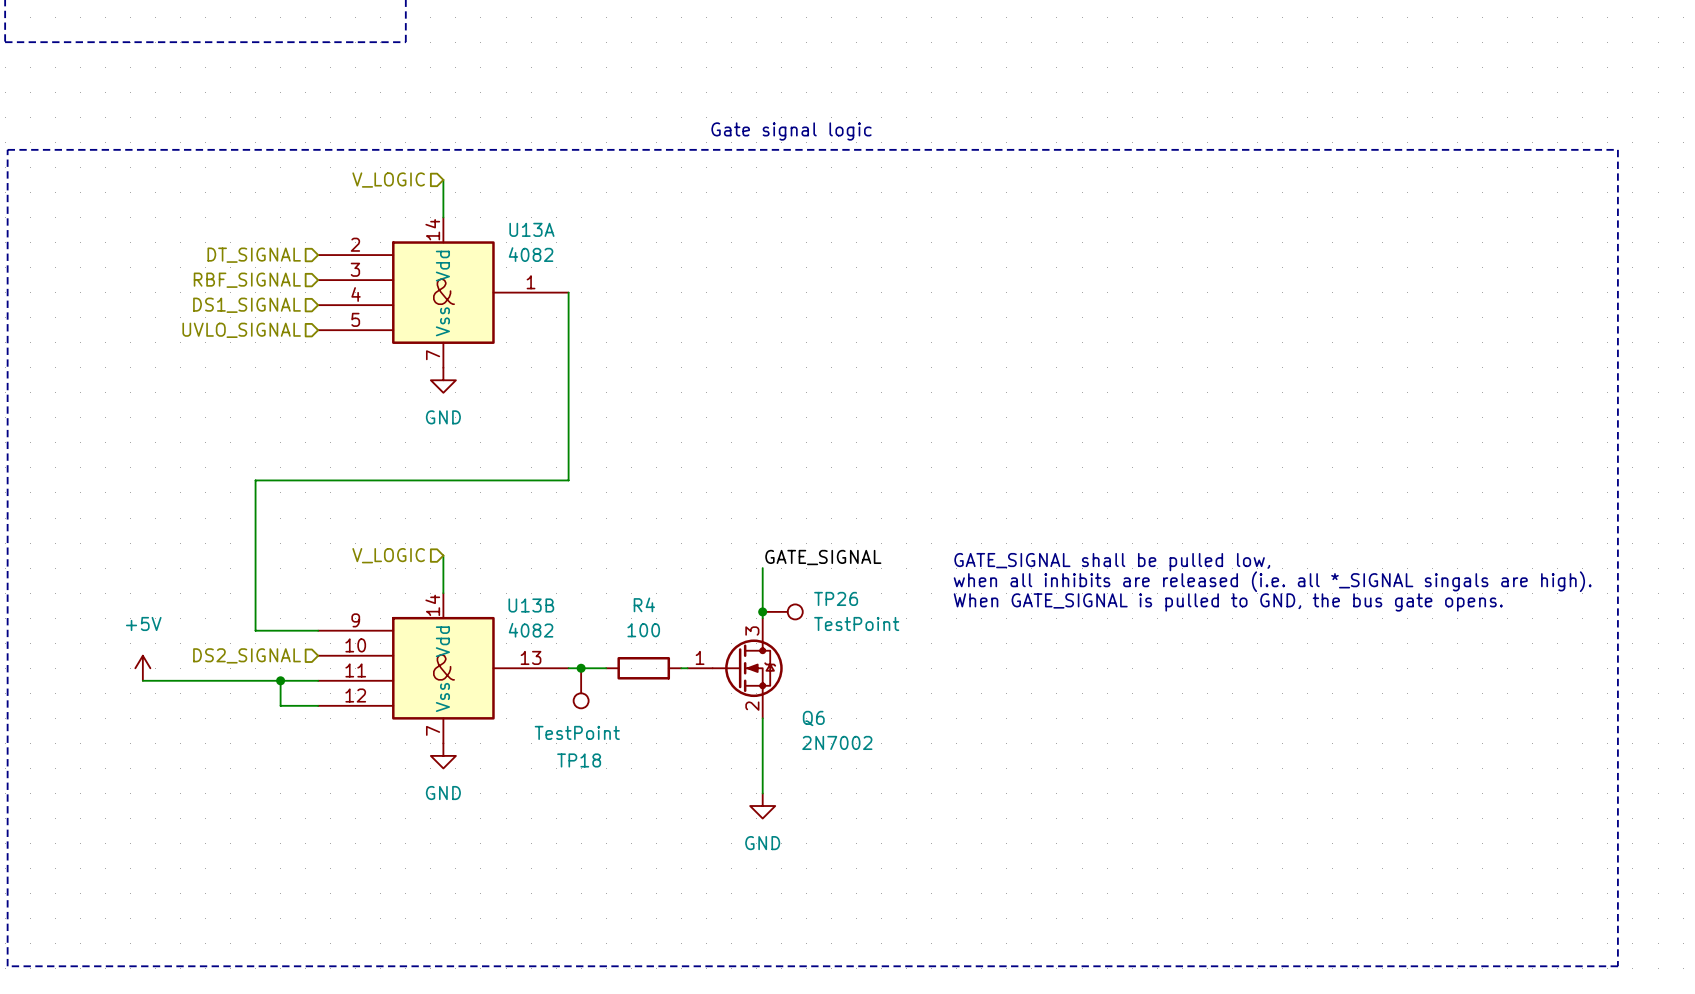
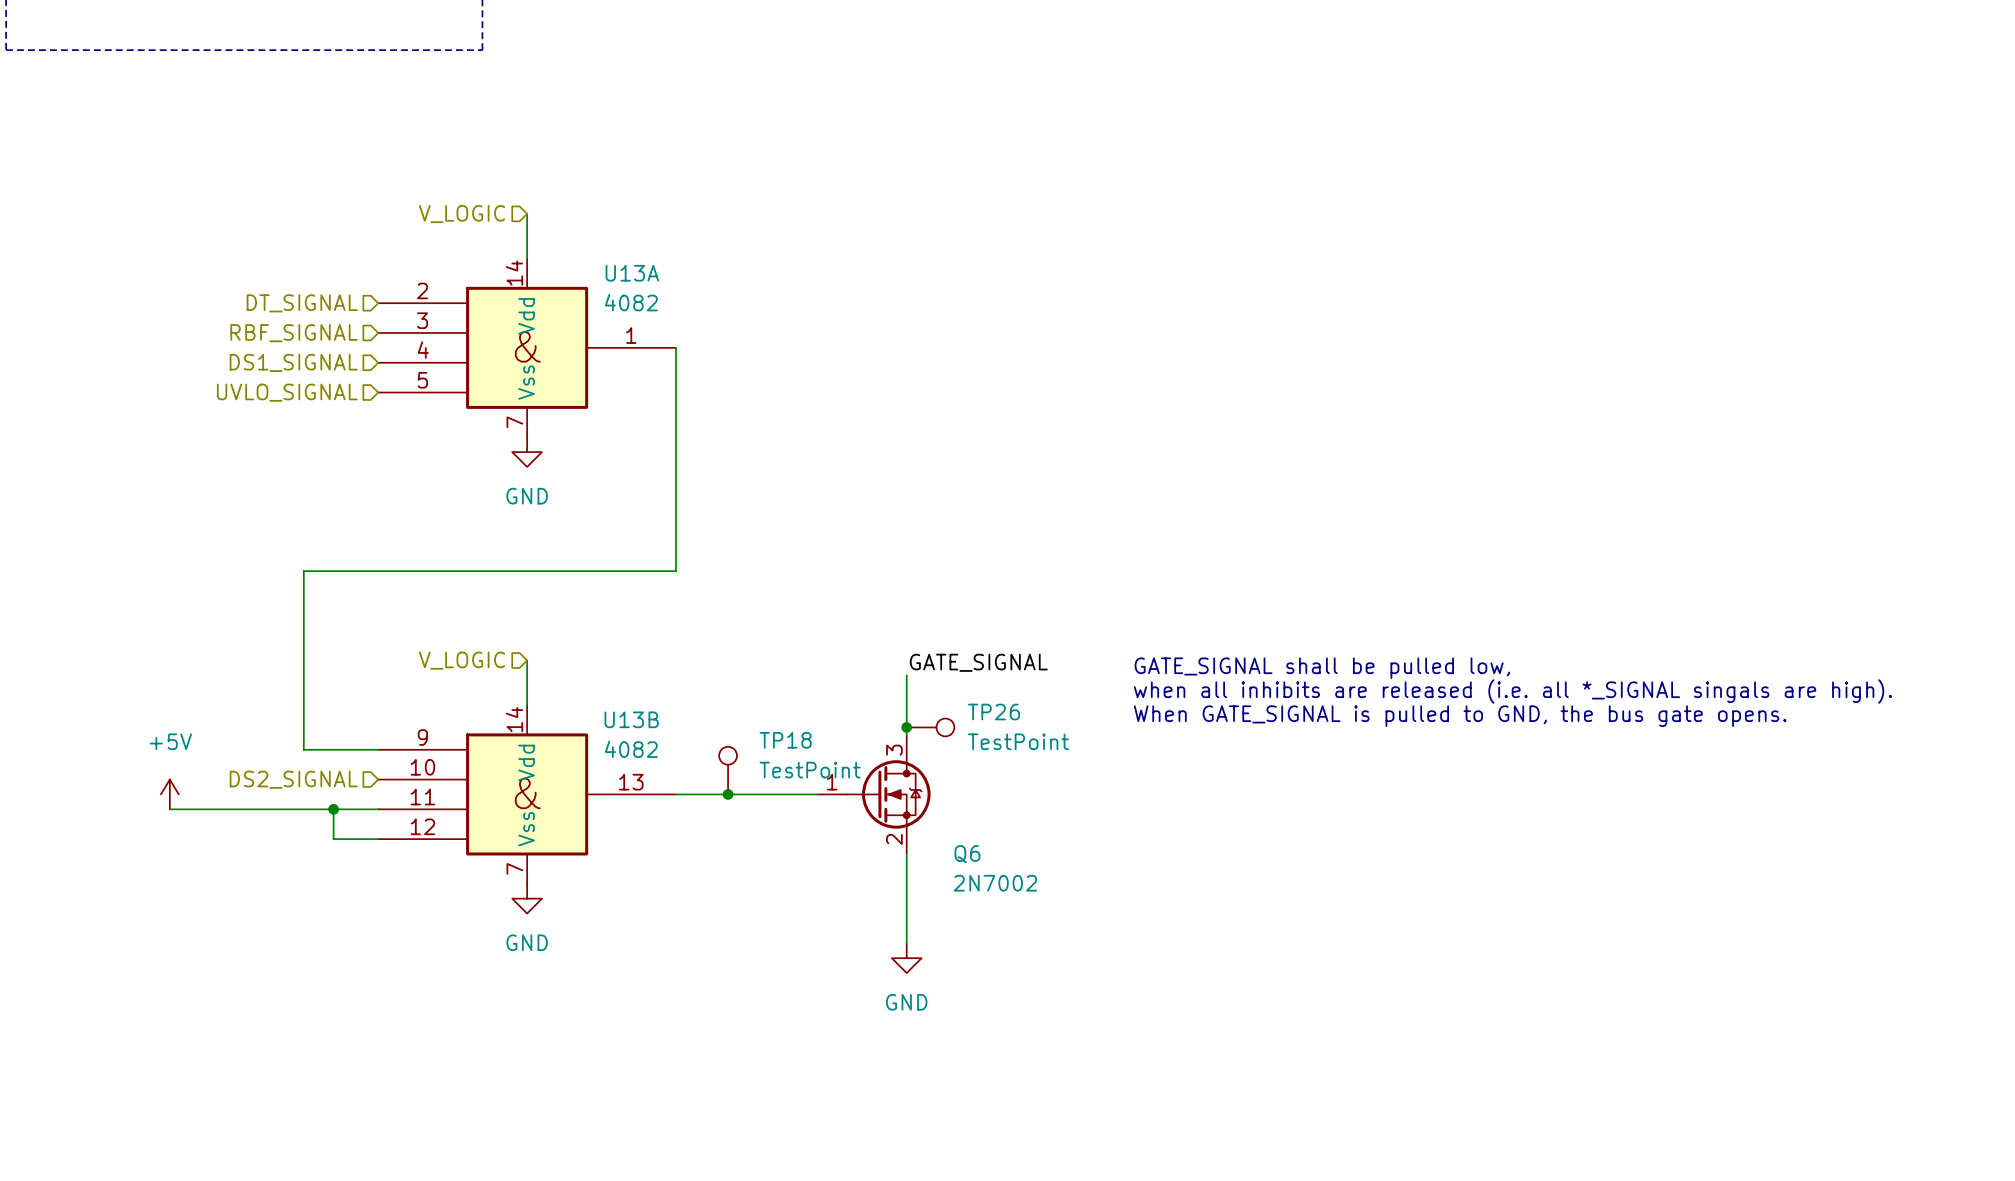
text: Gate signal logic (791, 131) -> none
line: (7, 149) (1617, 149) (1617, 966) (7, 966) (7, 149) -> none
junction position: (581, 668) -> (728, 794)
wire: none -> (720, 794) (809, 794)
R4: 100 (643, 668) -> none
TP18 position: (581, 688) -> (728, 770)
TP18 rotation: 0° (581, 700) -> 180° (728, 755)
TP18 value position: TestPoint (577, 732) -> TestPoint (810, 770)
TP18 name position: TP18 (579, 760) -> TP18 (785, 740)

